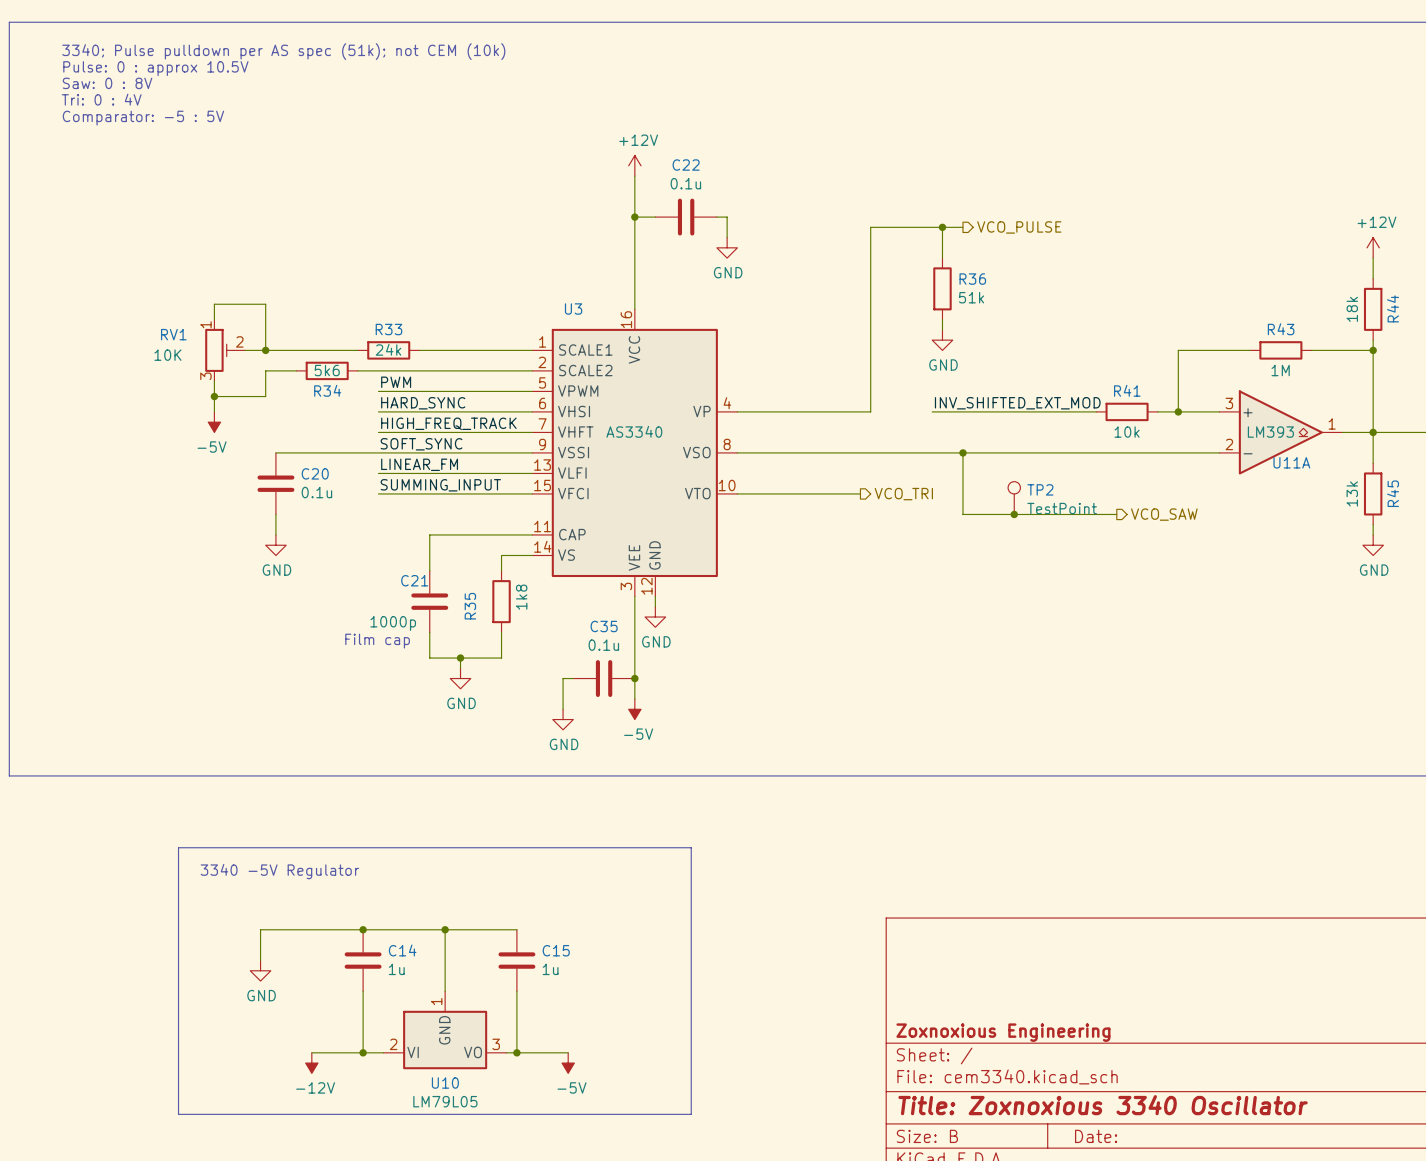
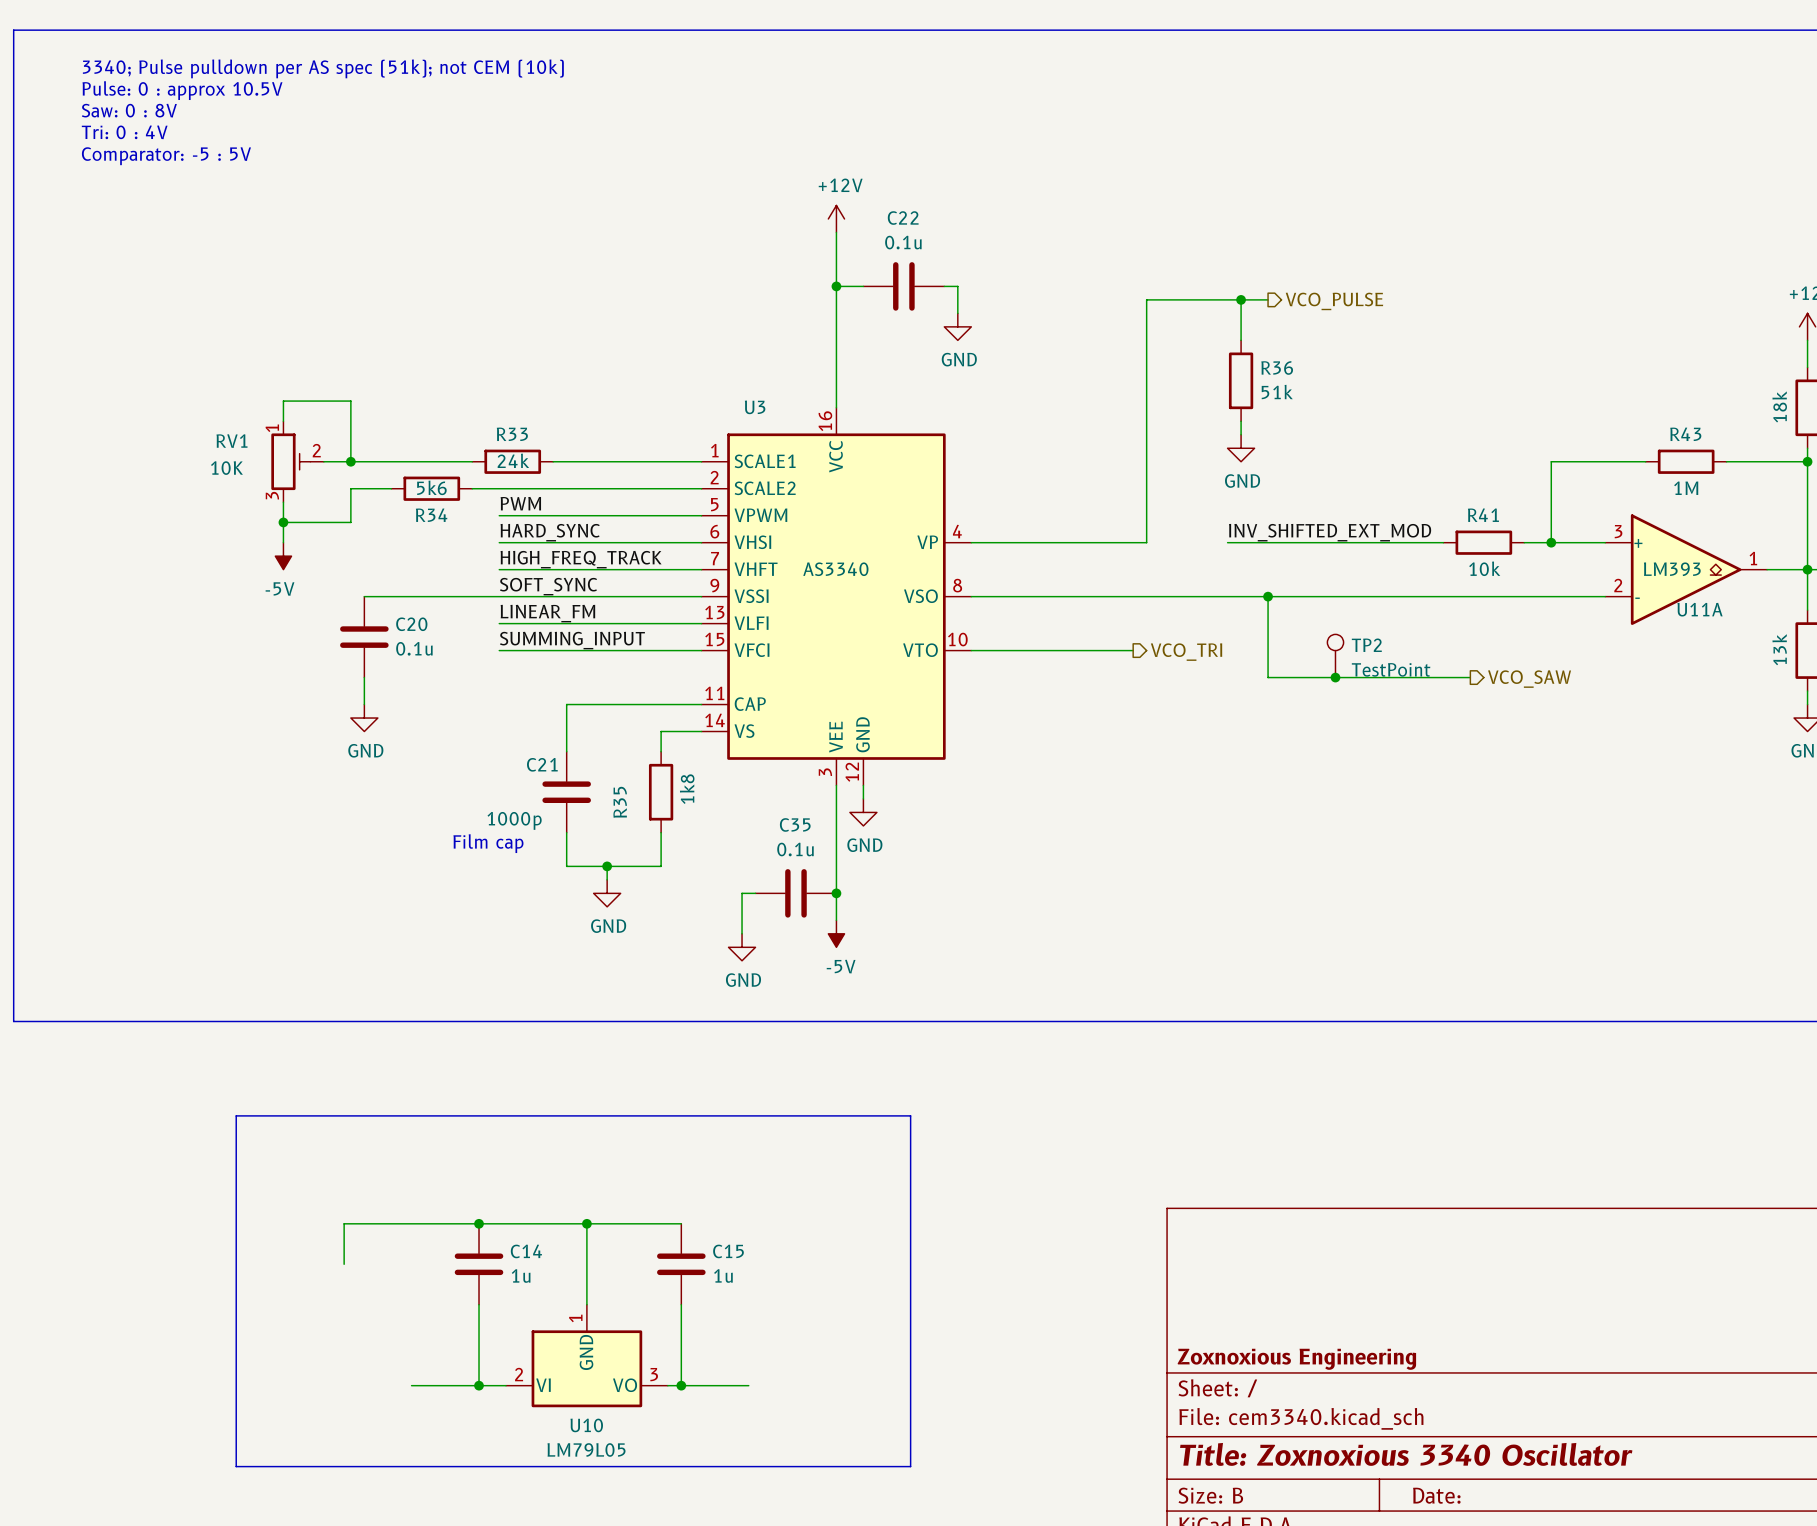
text: 3340 -5V Regulator (279, 871) -> none
power symbol: GND (260, 970) -> none
power symbol: -12V (311, 1063) -> none
power symbol: -5V (568, 1063) -> none

